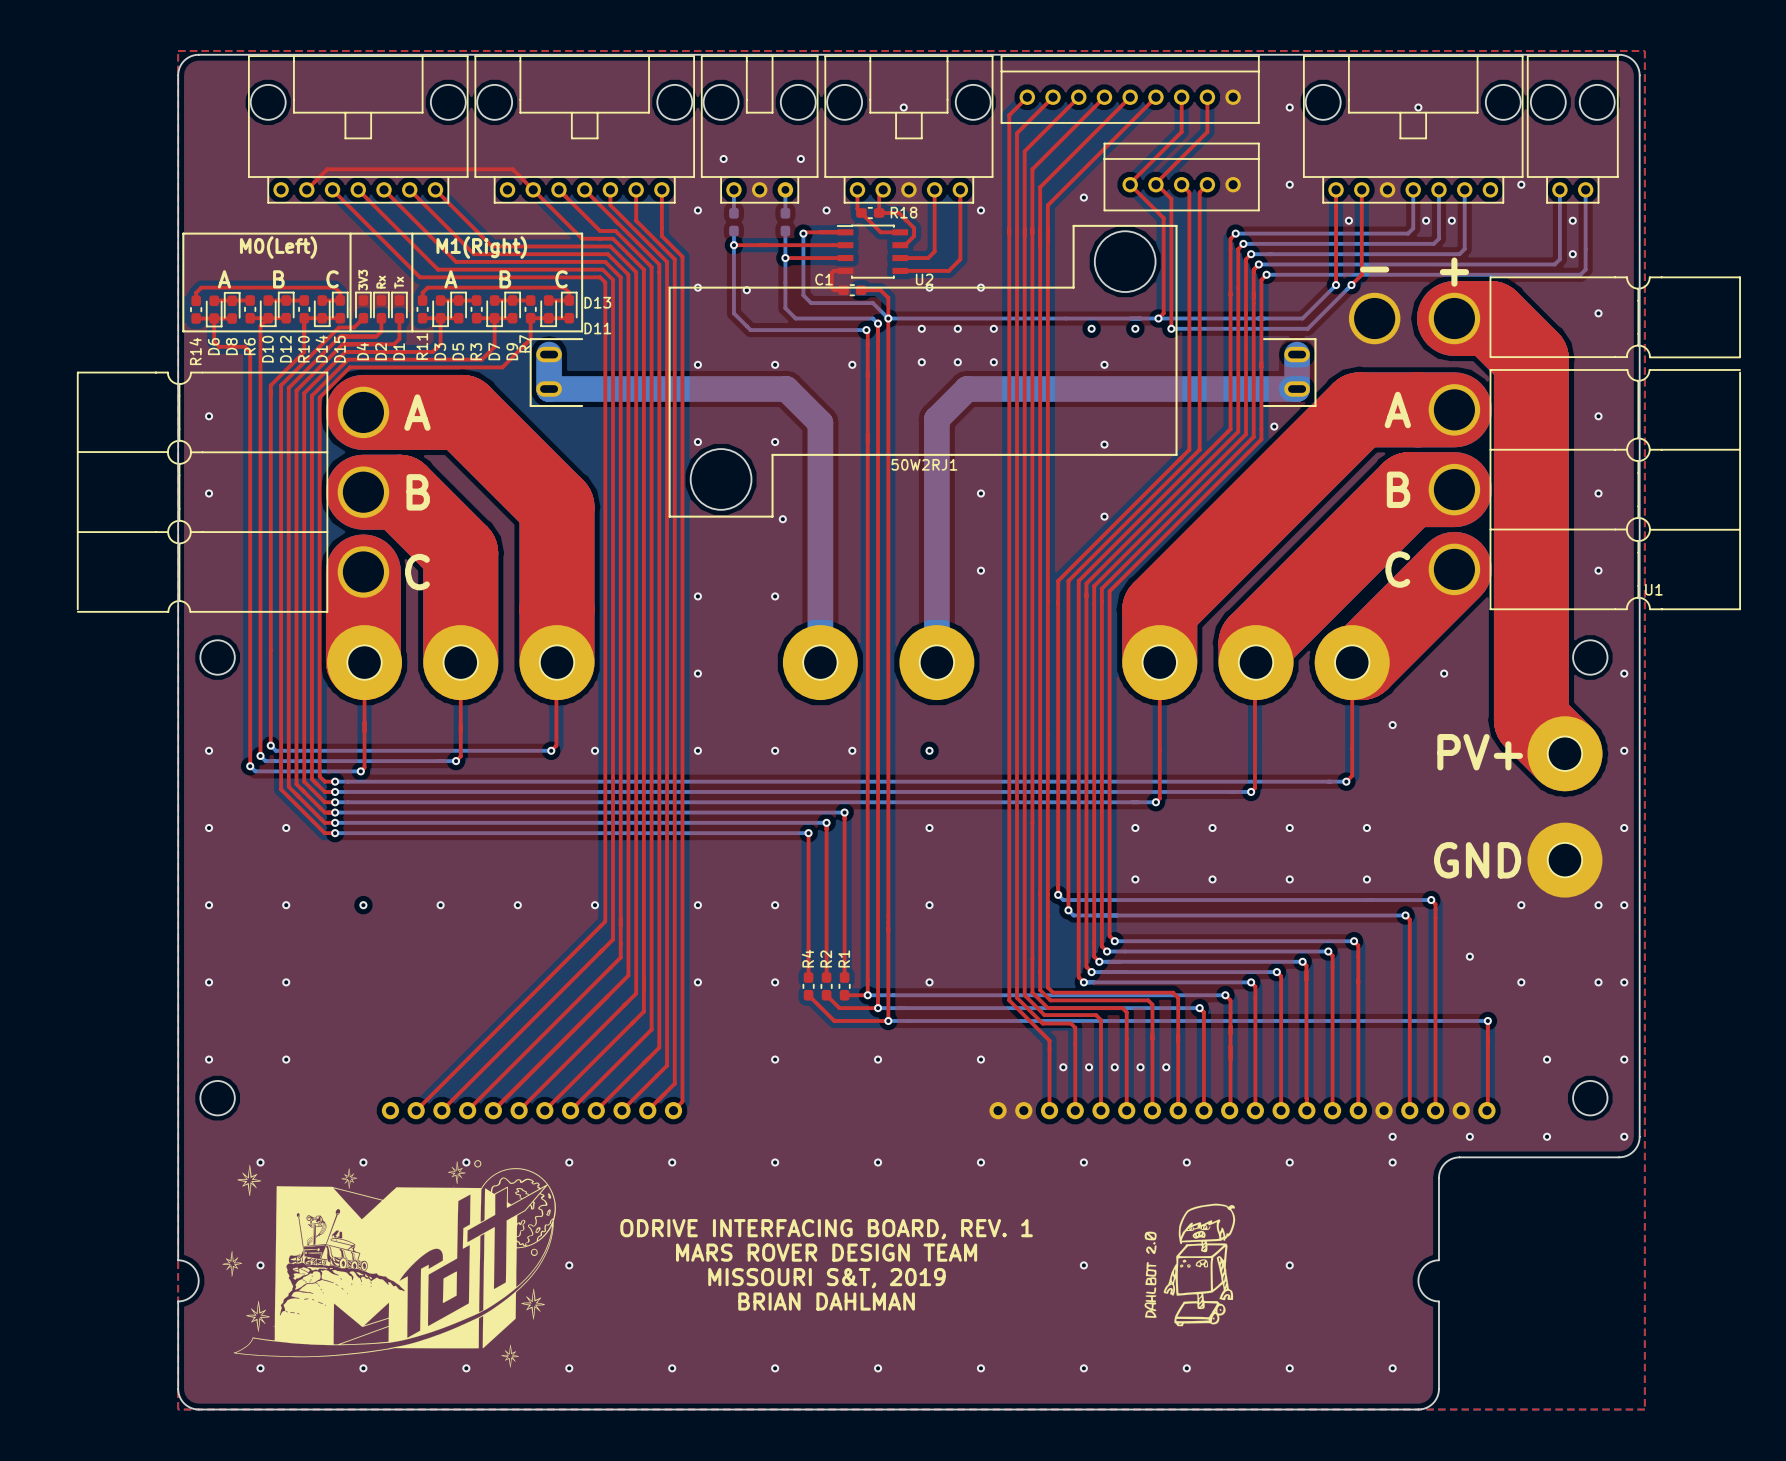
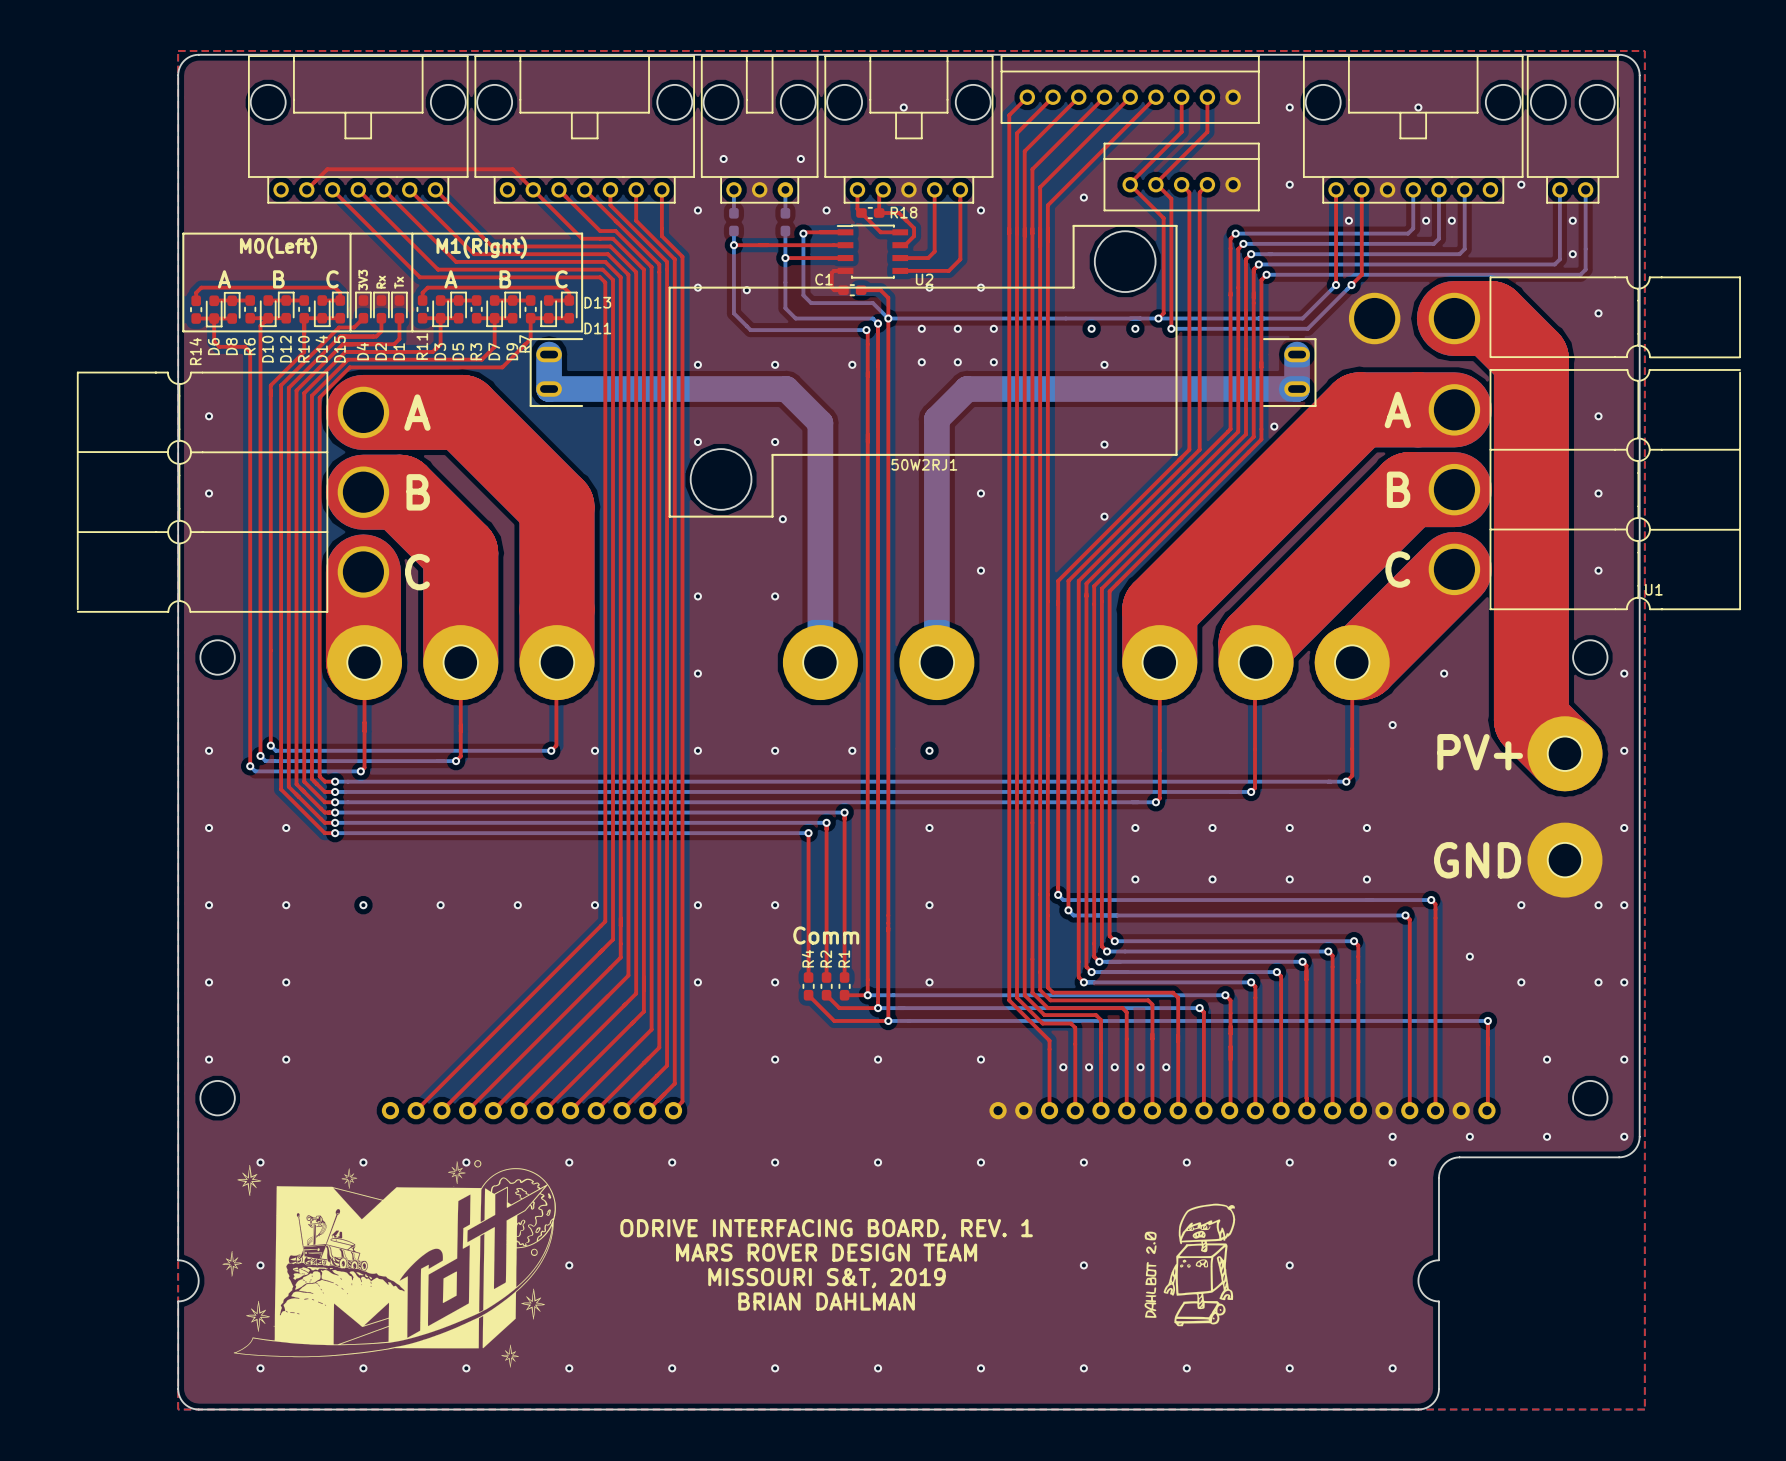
text: - (1374, 269) -> none
text: + (1454, 272) -> none
text: none -> Comm (826, 935)

